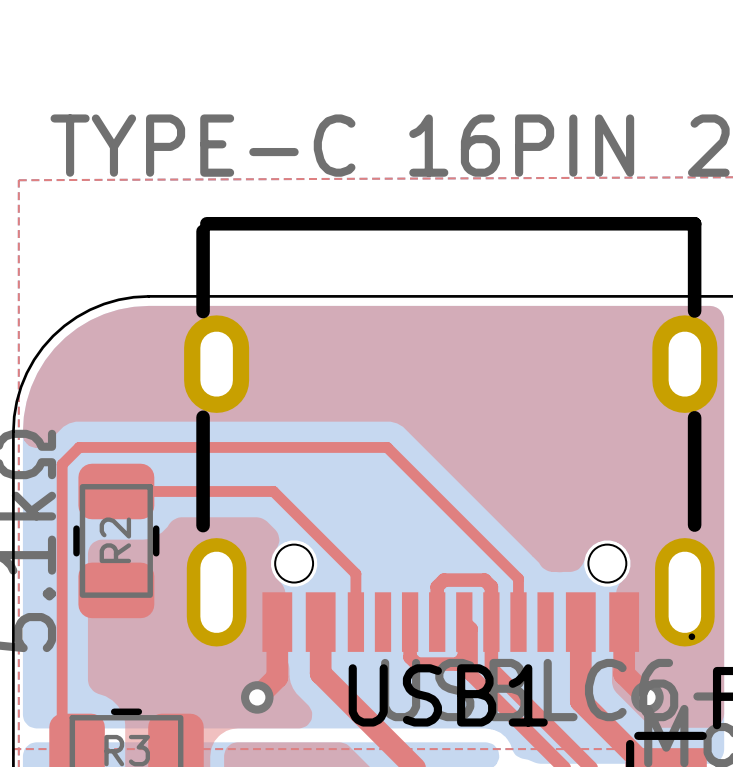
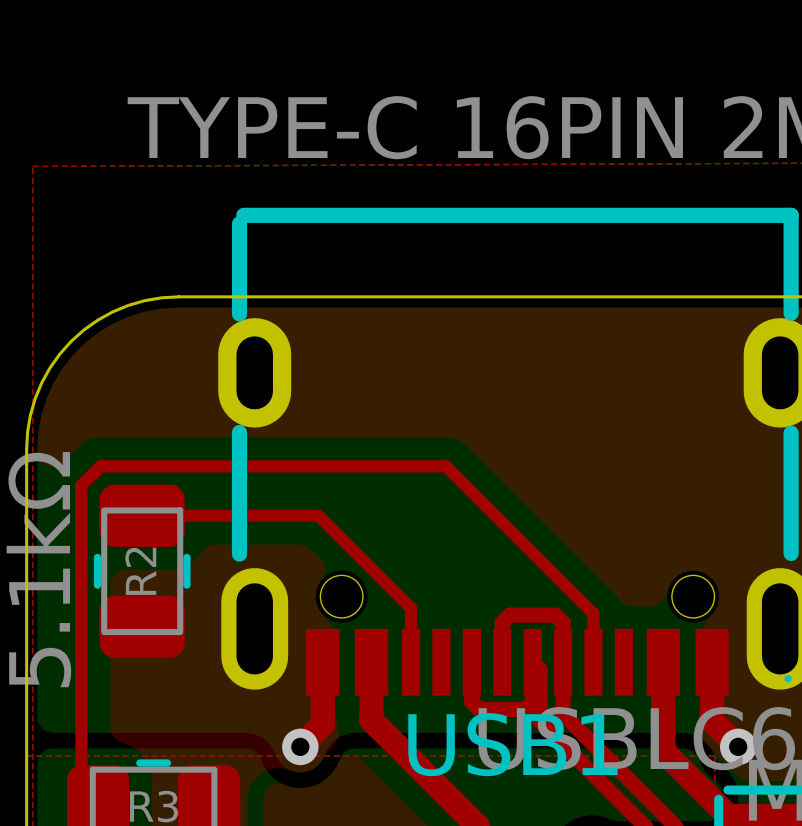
top zone outline: (13, 749) (626, 749) -> (26, 804) (26, 756) (714, 756) (714, 804)

